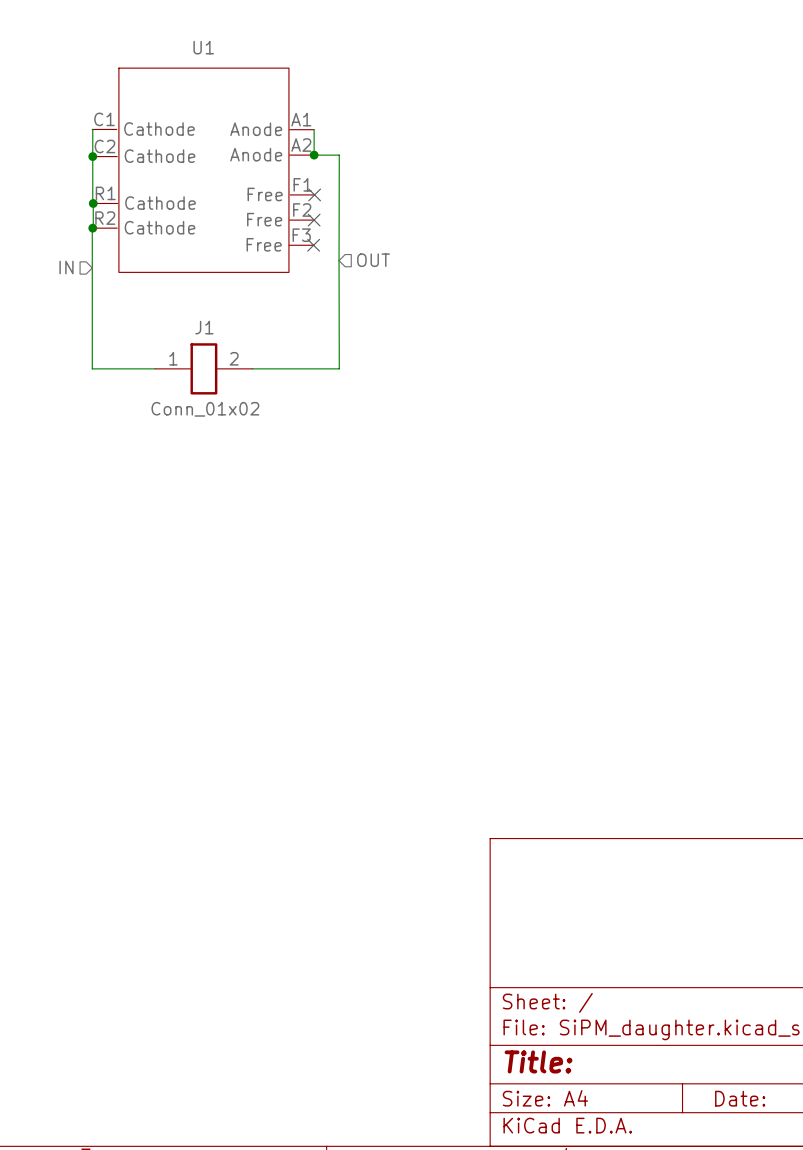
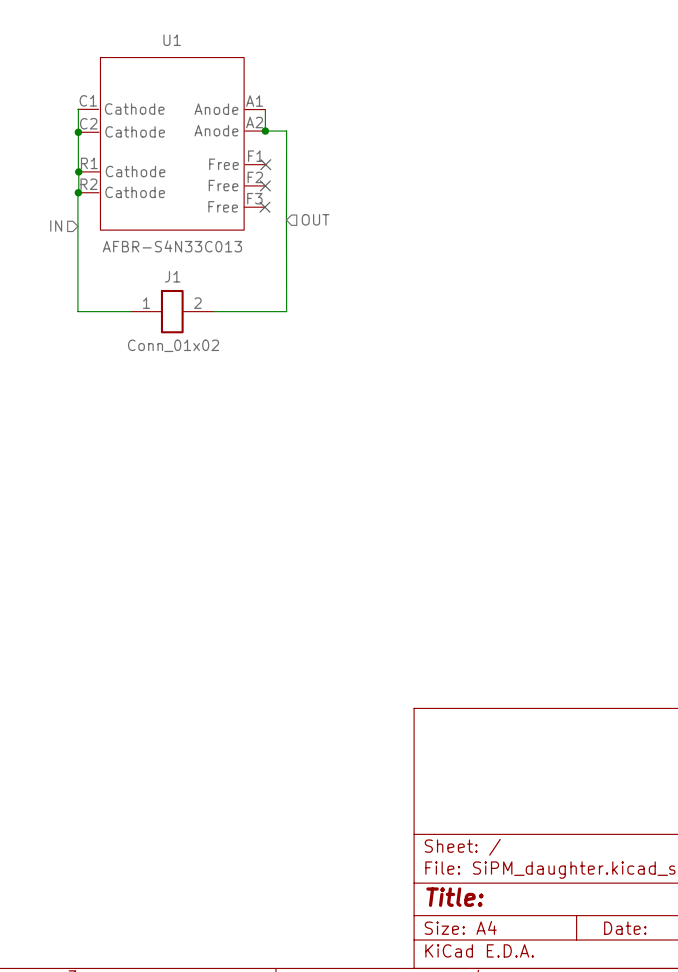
U1 value: none -> AFBR-S4N33C013 (172, 246)

